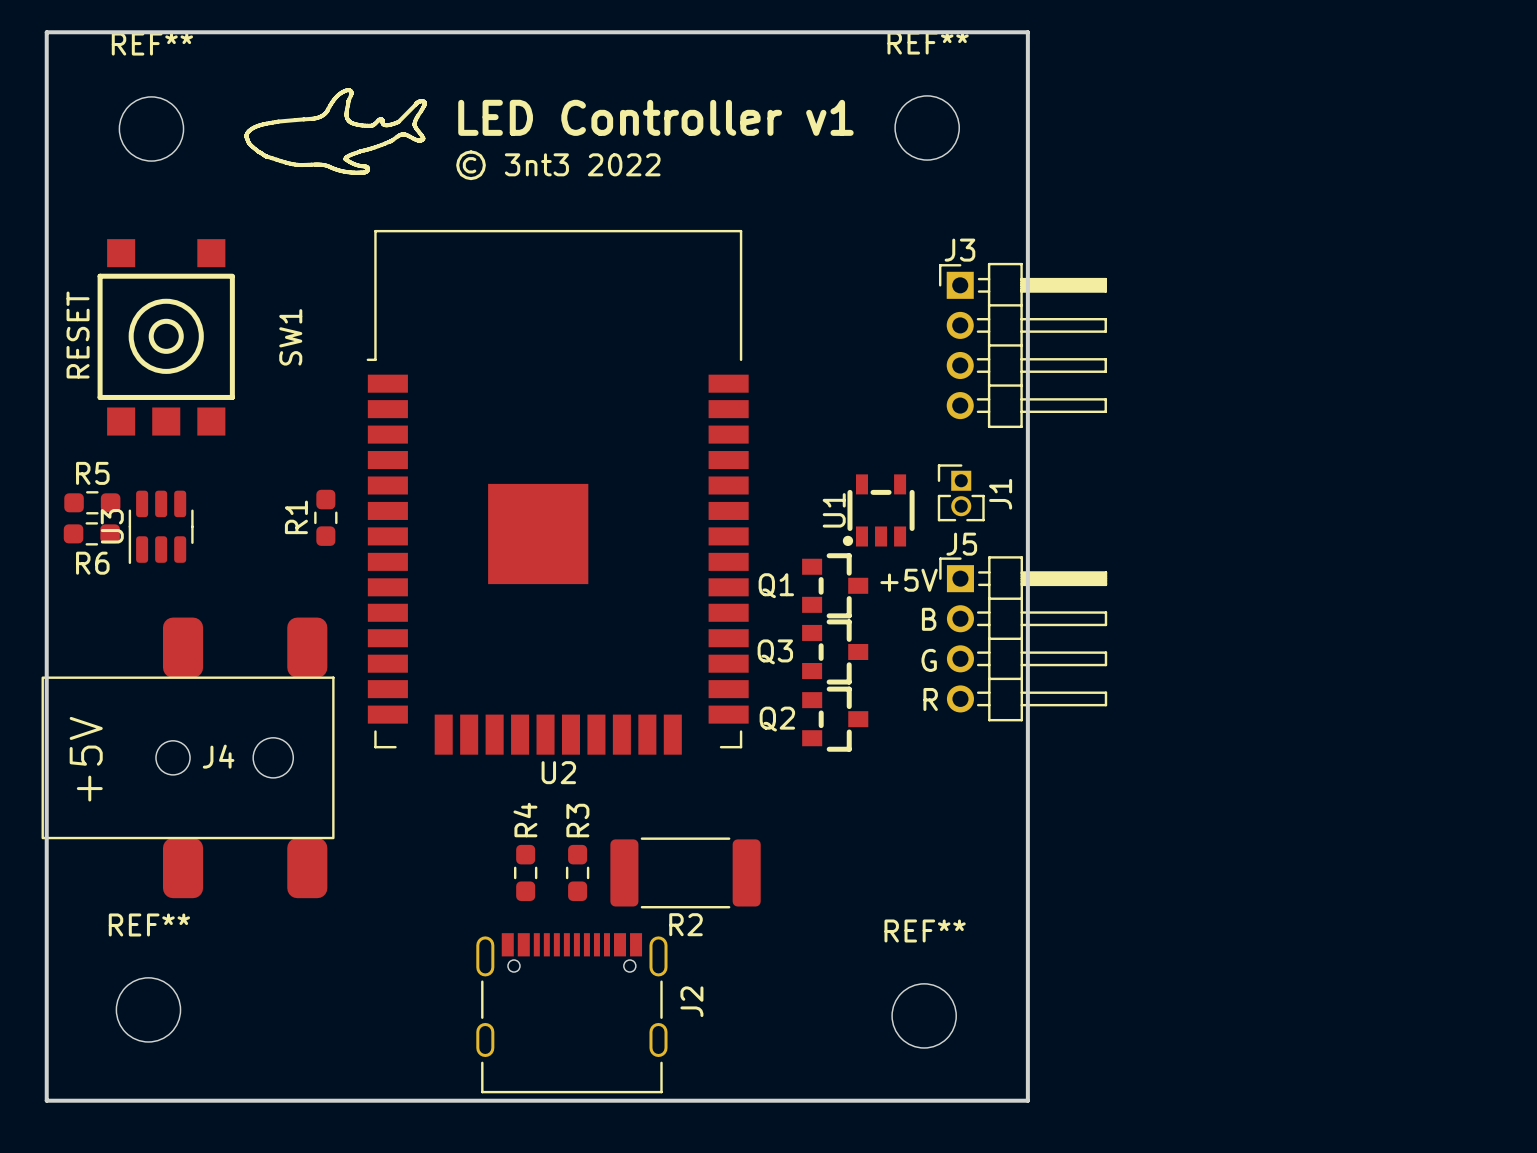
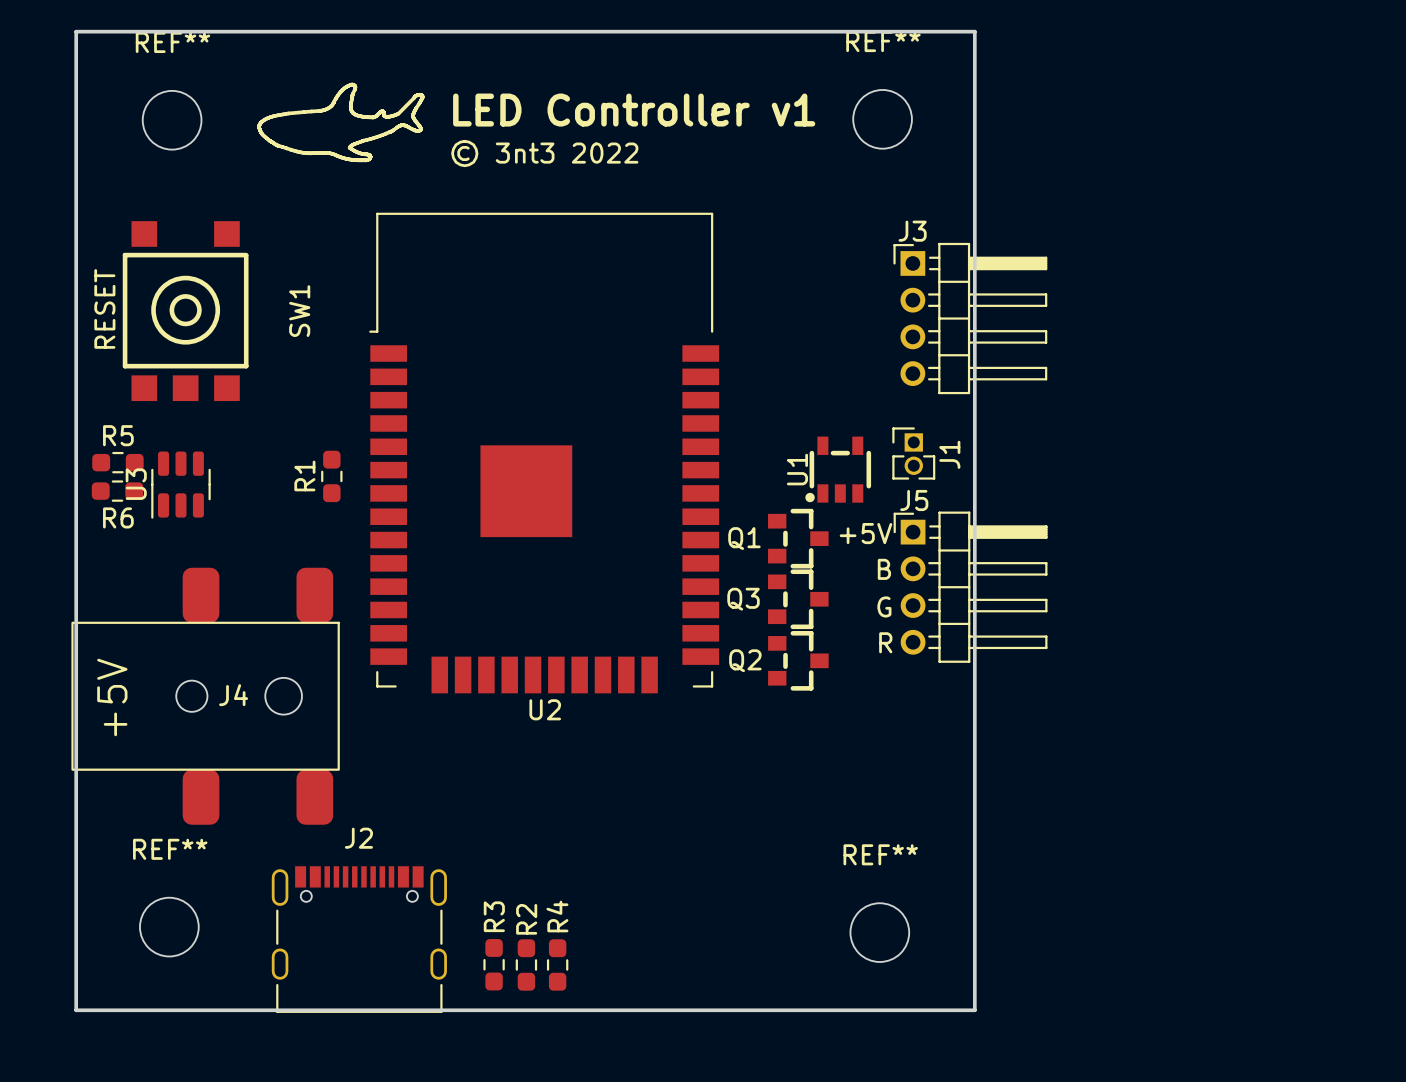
R2 footprint: [610, 837, 761, 909] -> [515, 939, 538, 991]
R4 position: (525, 872) -> (557, 964)
R3 position: (577, 872) -> (494, 964)
R2 name position: R2 (686, 924) -> R2 (526, 919)
J2 name rotation: 0° (691, 1001) -> 90° clockwise (358, 838)
J2 name position: J2 (691, 1001) -> J2 (358, 838)
J2 position: (571, 1013) -> (359, 939)

